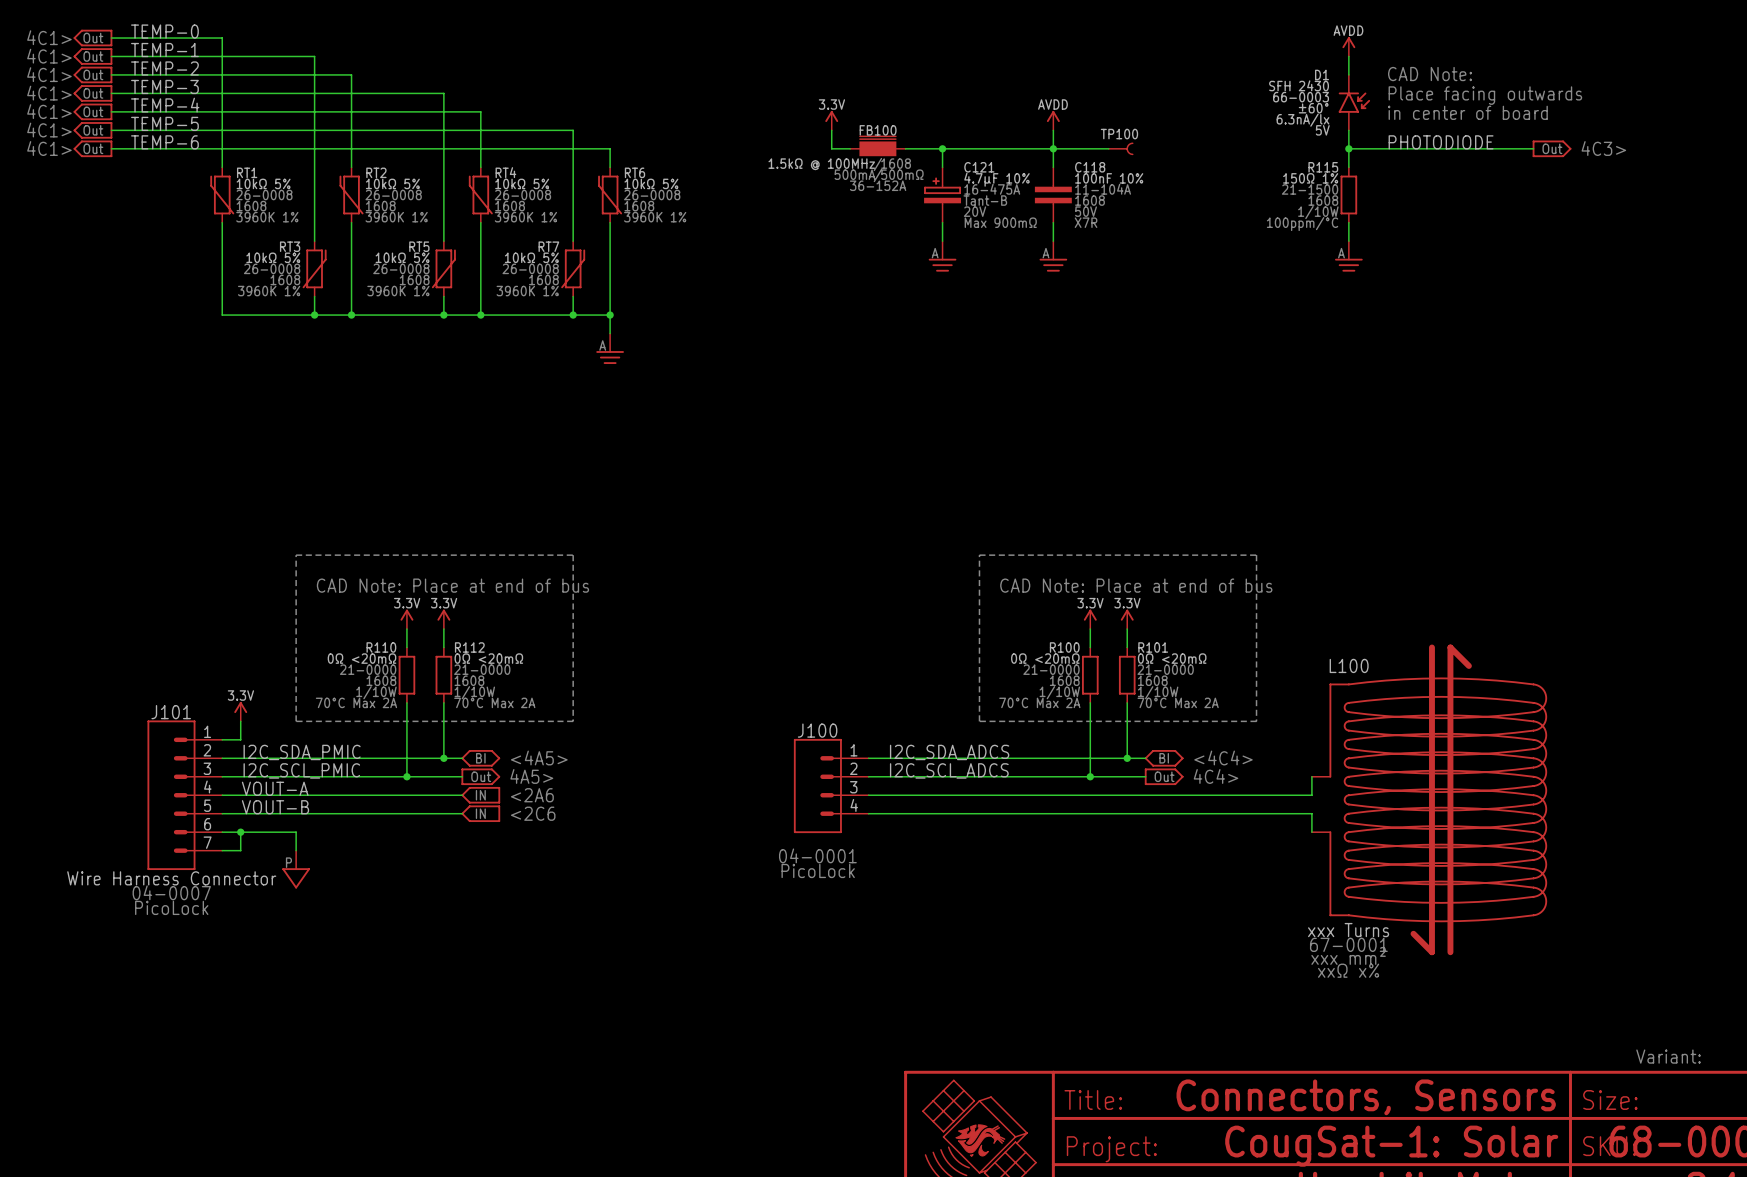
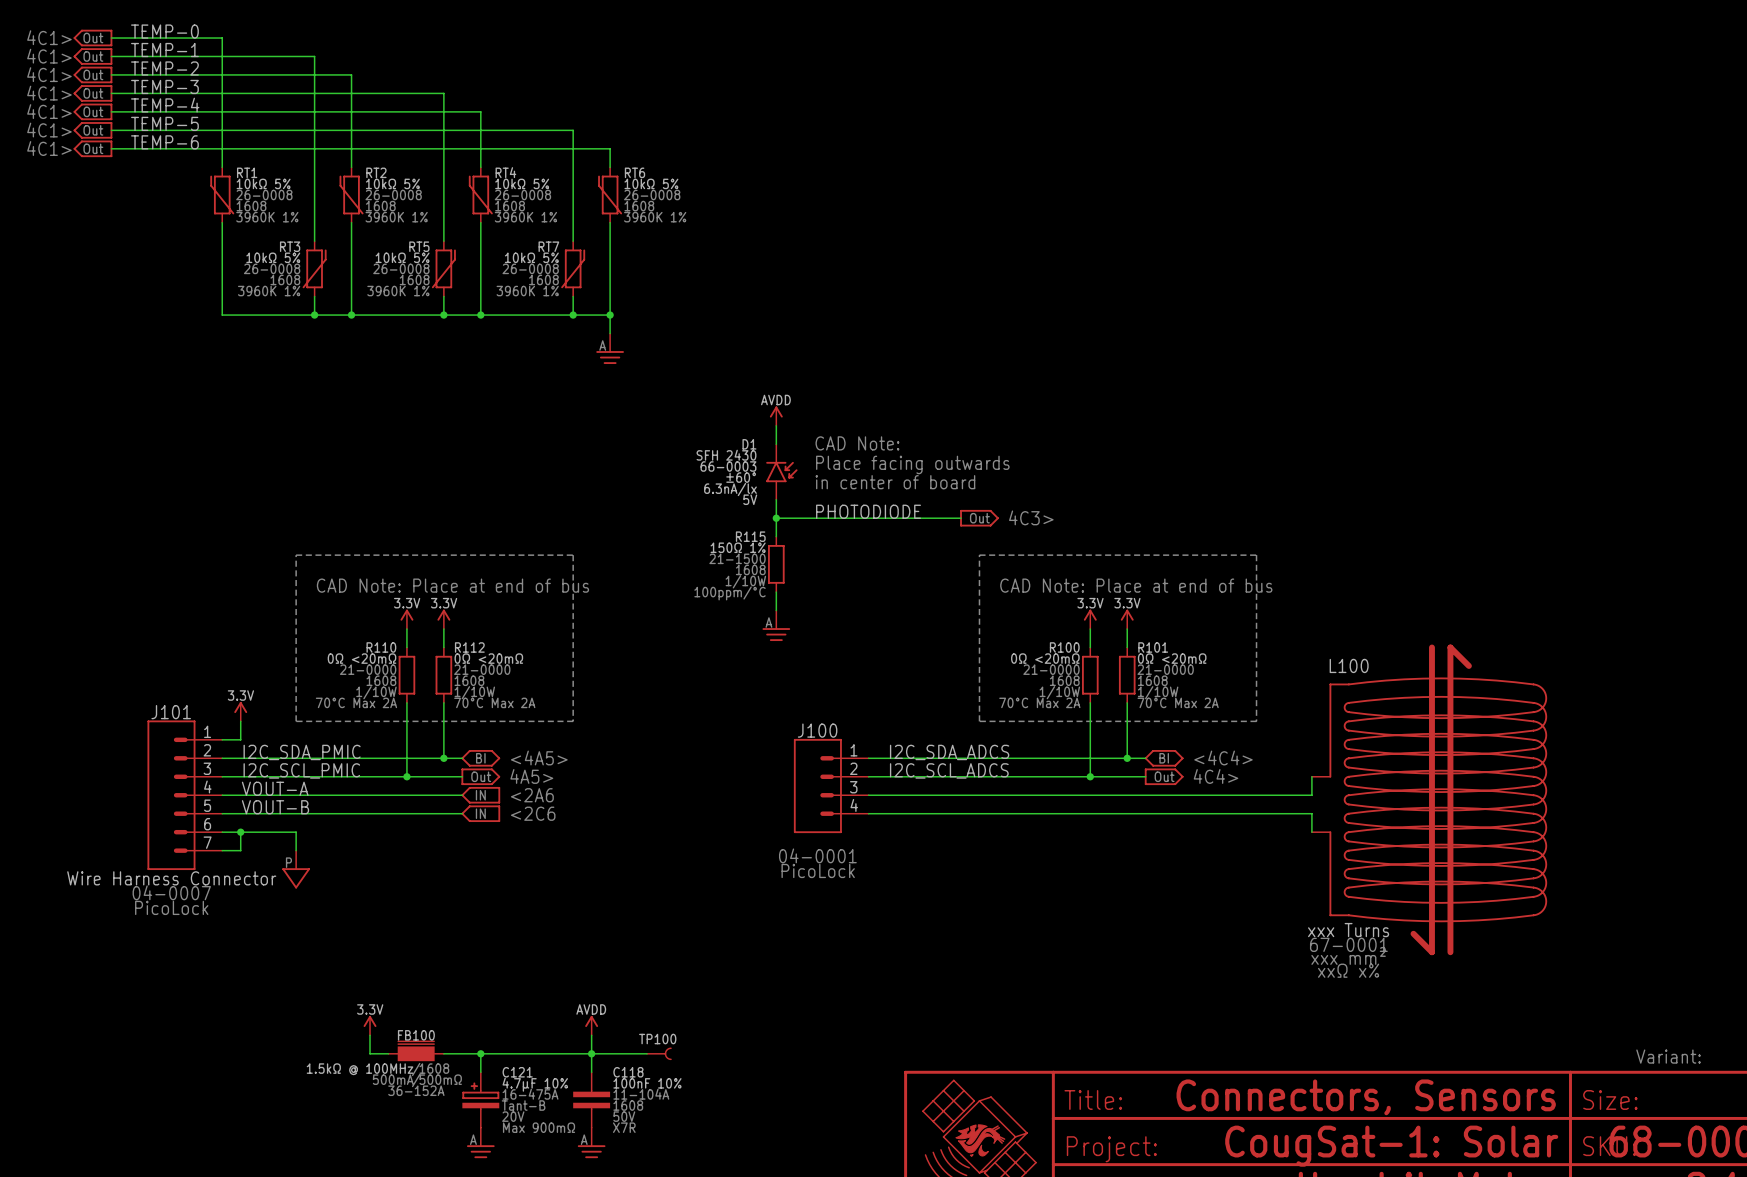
power symbol: AVDD (1348, 46) -> none
wire: (1348, 56) (1348, 74) -> none
text: CAD Note: (1429, 74) -> none
text: Place facing outwards (1485, 95) -> none
D1 position: (1354, 102) -> (781, 472)
text: in center of board (1467, 112) -> none
power symbol: 3.3V (831, 120) -> none
power symbol: AVDD (1053, 120) -> none
wire: (831, 130) (831, 148) (850, 148) -> none
wire: (1053, 130) (1053, 167) -> none
wire: (1348, 130) (1348, 167) -> none
label: PHOTODIODE (1441, 142) -> none
FB100 position: (877, 146) -> (416, 1050)
wire: (905, 148) (1108, 148) -> none
wire: (942, 148) (942, 167) -> none
junction: (942, 148) -> none
junction: (1053, 148) -> none
TP100 position: (1120, 148) -> (659, 1053)
wire: (1348, 148) (1533, 148) -> none
junction: (1348, 148) -> none
part: (1552, 148) -> none
text: 4C3> (1603, 148) -> none
C121 position: (942, 195) -> (480, 1099)
C118 position: (1053, 195) -> (591, 1099)
R115 position: (1348, 195) -> (776, 564)
wire: (942, 222) (942, 241) -> none
wire: (1053, 222) (1053, 241) -> none
wire: (1348, 222) (1348, 241) -> none
power symbol: (942, 256) -> none
power symbol: (1053, 256) -> none
power symbol: (1348, 256) -> none
power symbol: none -> AVDD (776, 416)
wire: none -> (776, 425) (776, 444)
text: none -> CAD Note: (857, 443)
text: none -> Place facing outwards (912, 464)
text: none -> in center of board (895, 482)
wire: none -> (776, 499) (776, 536)
label: none -> PHOTODIODE (868, 511)
text: none -> 4C3> (1031, 517)
wire: none -> (776, 518) (961, 518)
junction: none -> (776, 518)
part: none -> (979, 518)
wire: none -> (776, 592) (776, 610)
power symbol: none -> (776, 625)
power symbol: none -> 3.3V (370, 1025)
power symbol: none -> AVDD (591, 1025)
wire: none -> (370, 1035) (370, 1053) (388, 1053)
wire: none -> (591, 1035) (591, 1072)
wire: none -> (443, 1053) (647, 1053)
wire: none -> (480, 1053) (480, 1072)
junction: none -> (480, 1053)
junction: none -> (591, 1053)
power symbol: none -> (480, 1142)
power symbol: none -> (591, 1142)

